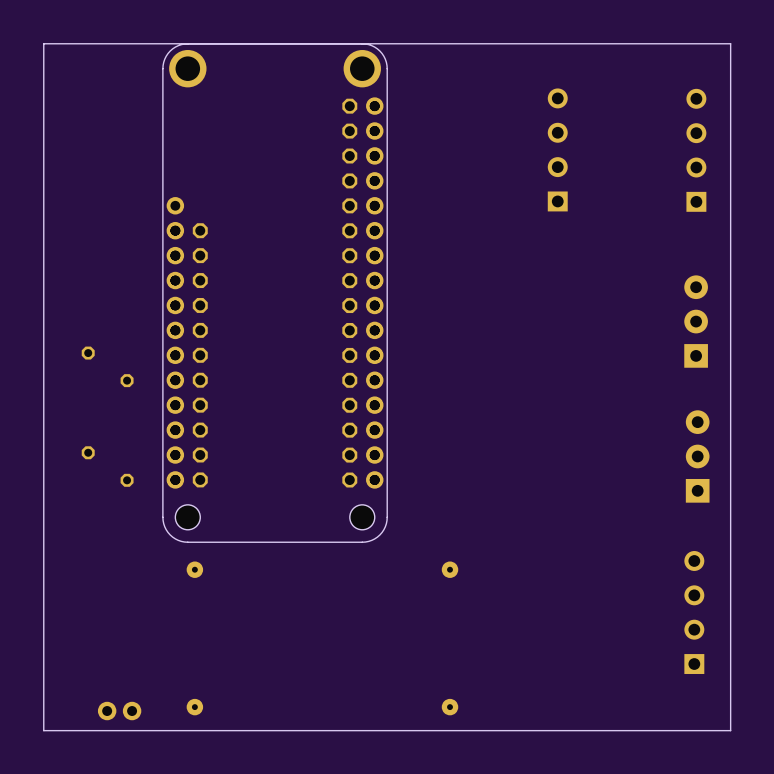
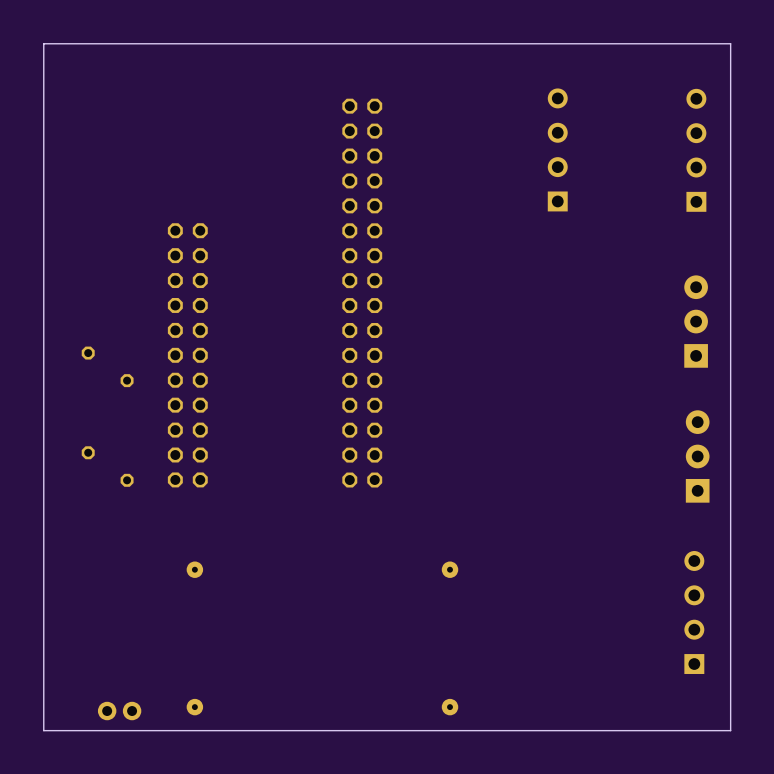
part: (275, 293) -> none

